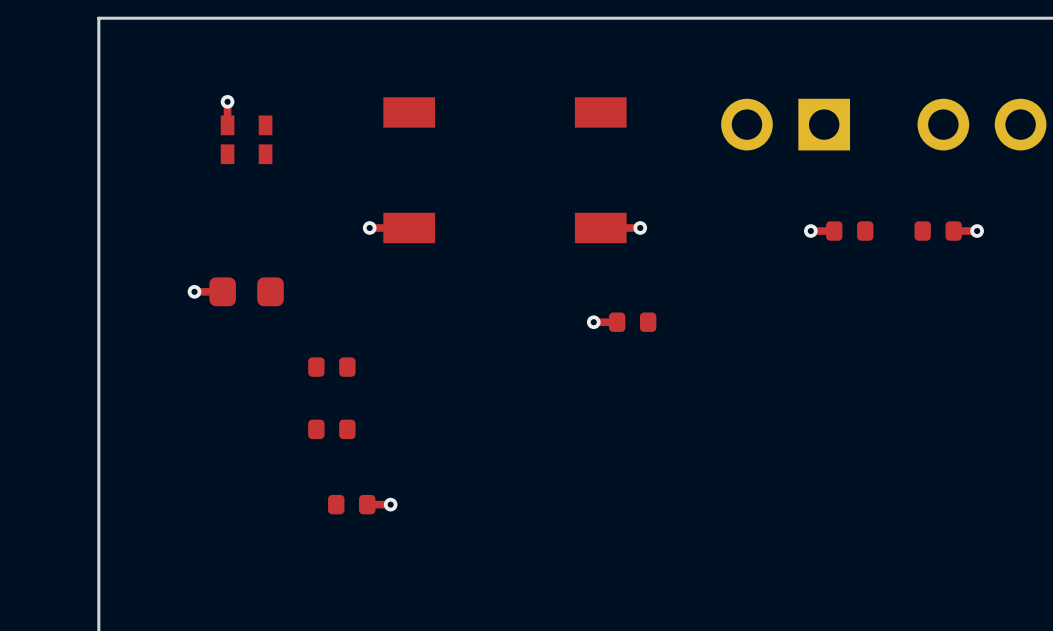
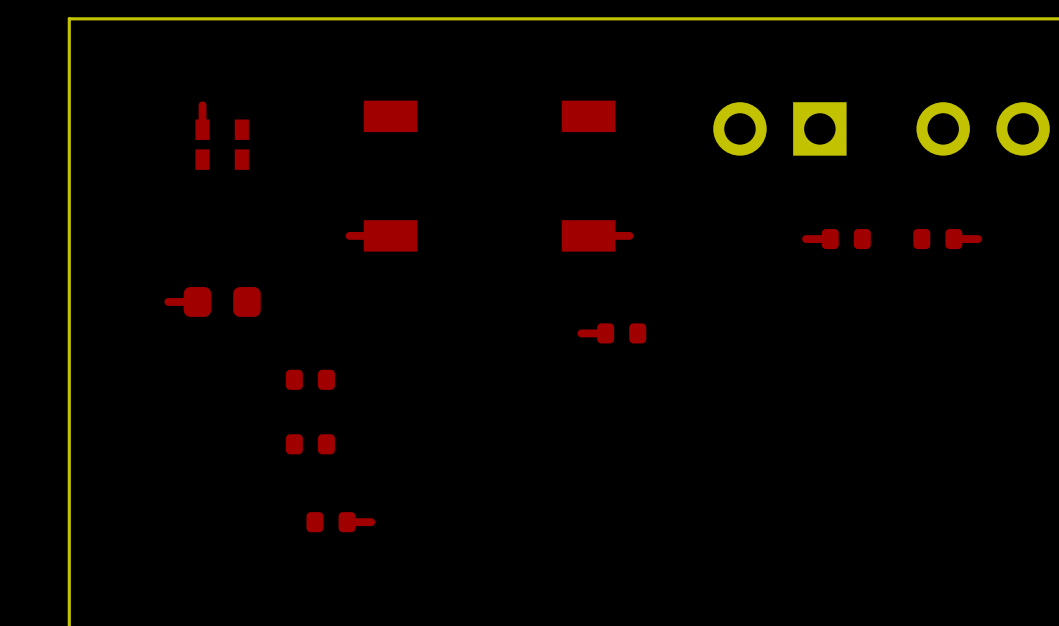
via: (227, 101) -> none
via: (369, 227) -> none
via: (640, 227) -> none
via: (810, 231) -> none
via: (977, 231) -> none
via: (194, 291) -> none
via: (593, 322) -> none
via: (390, 504) -> none

